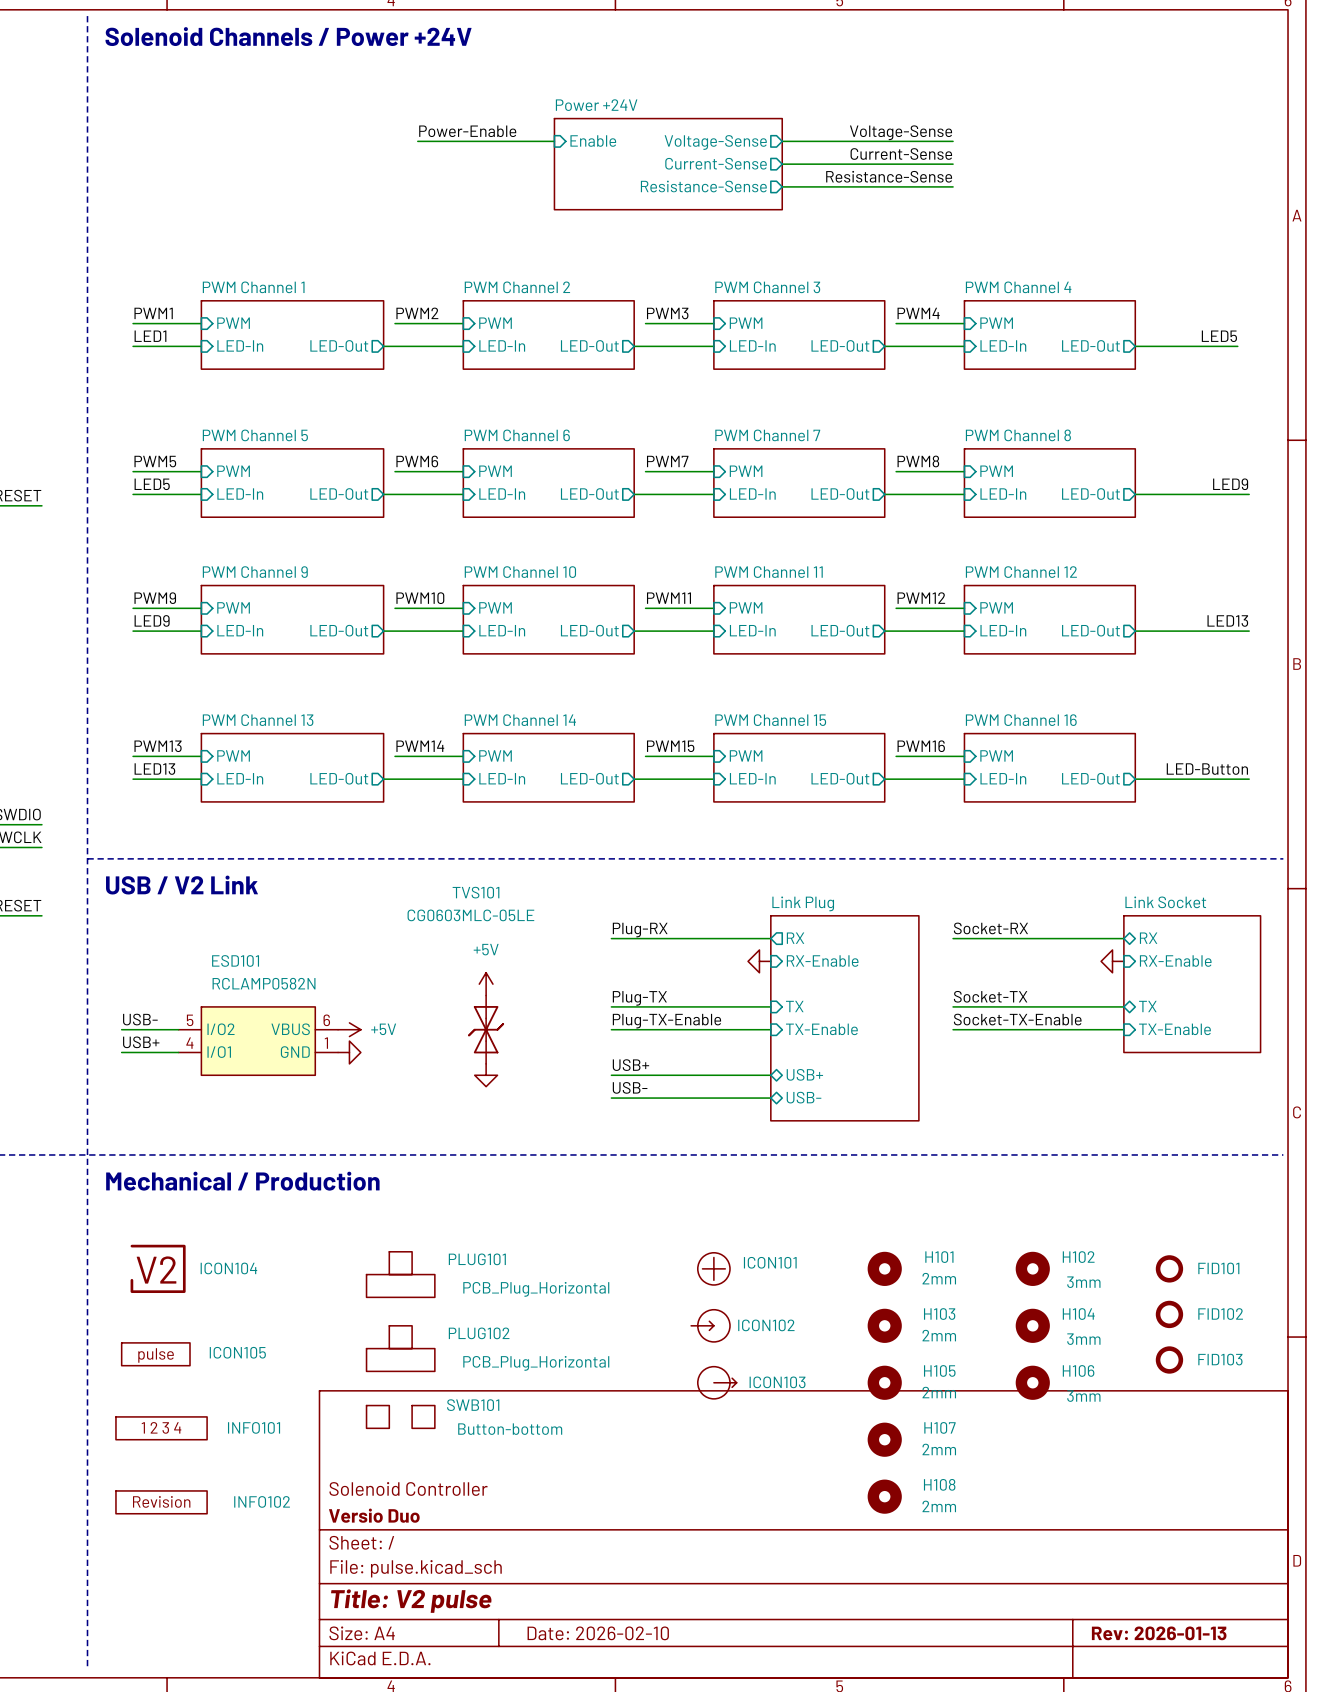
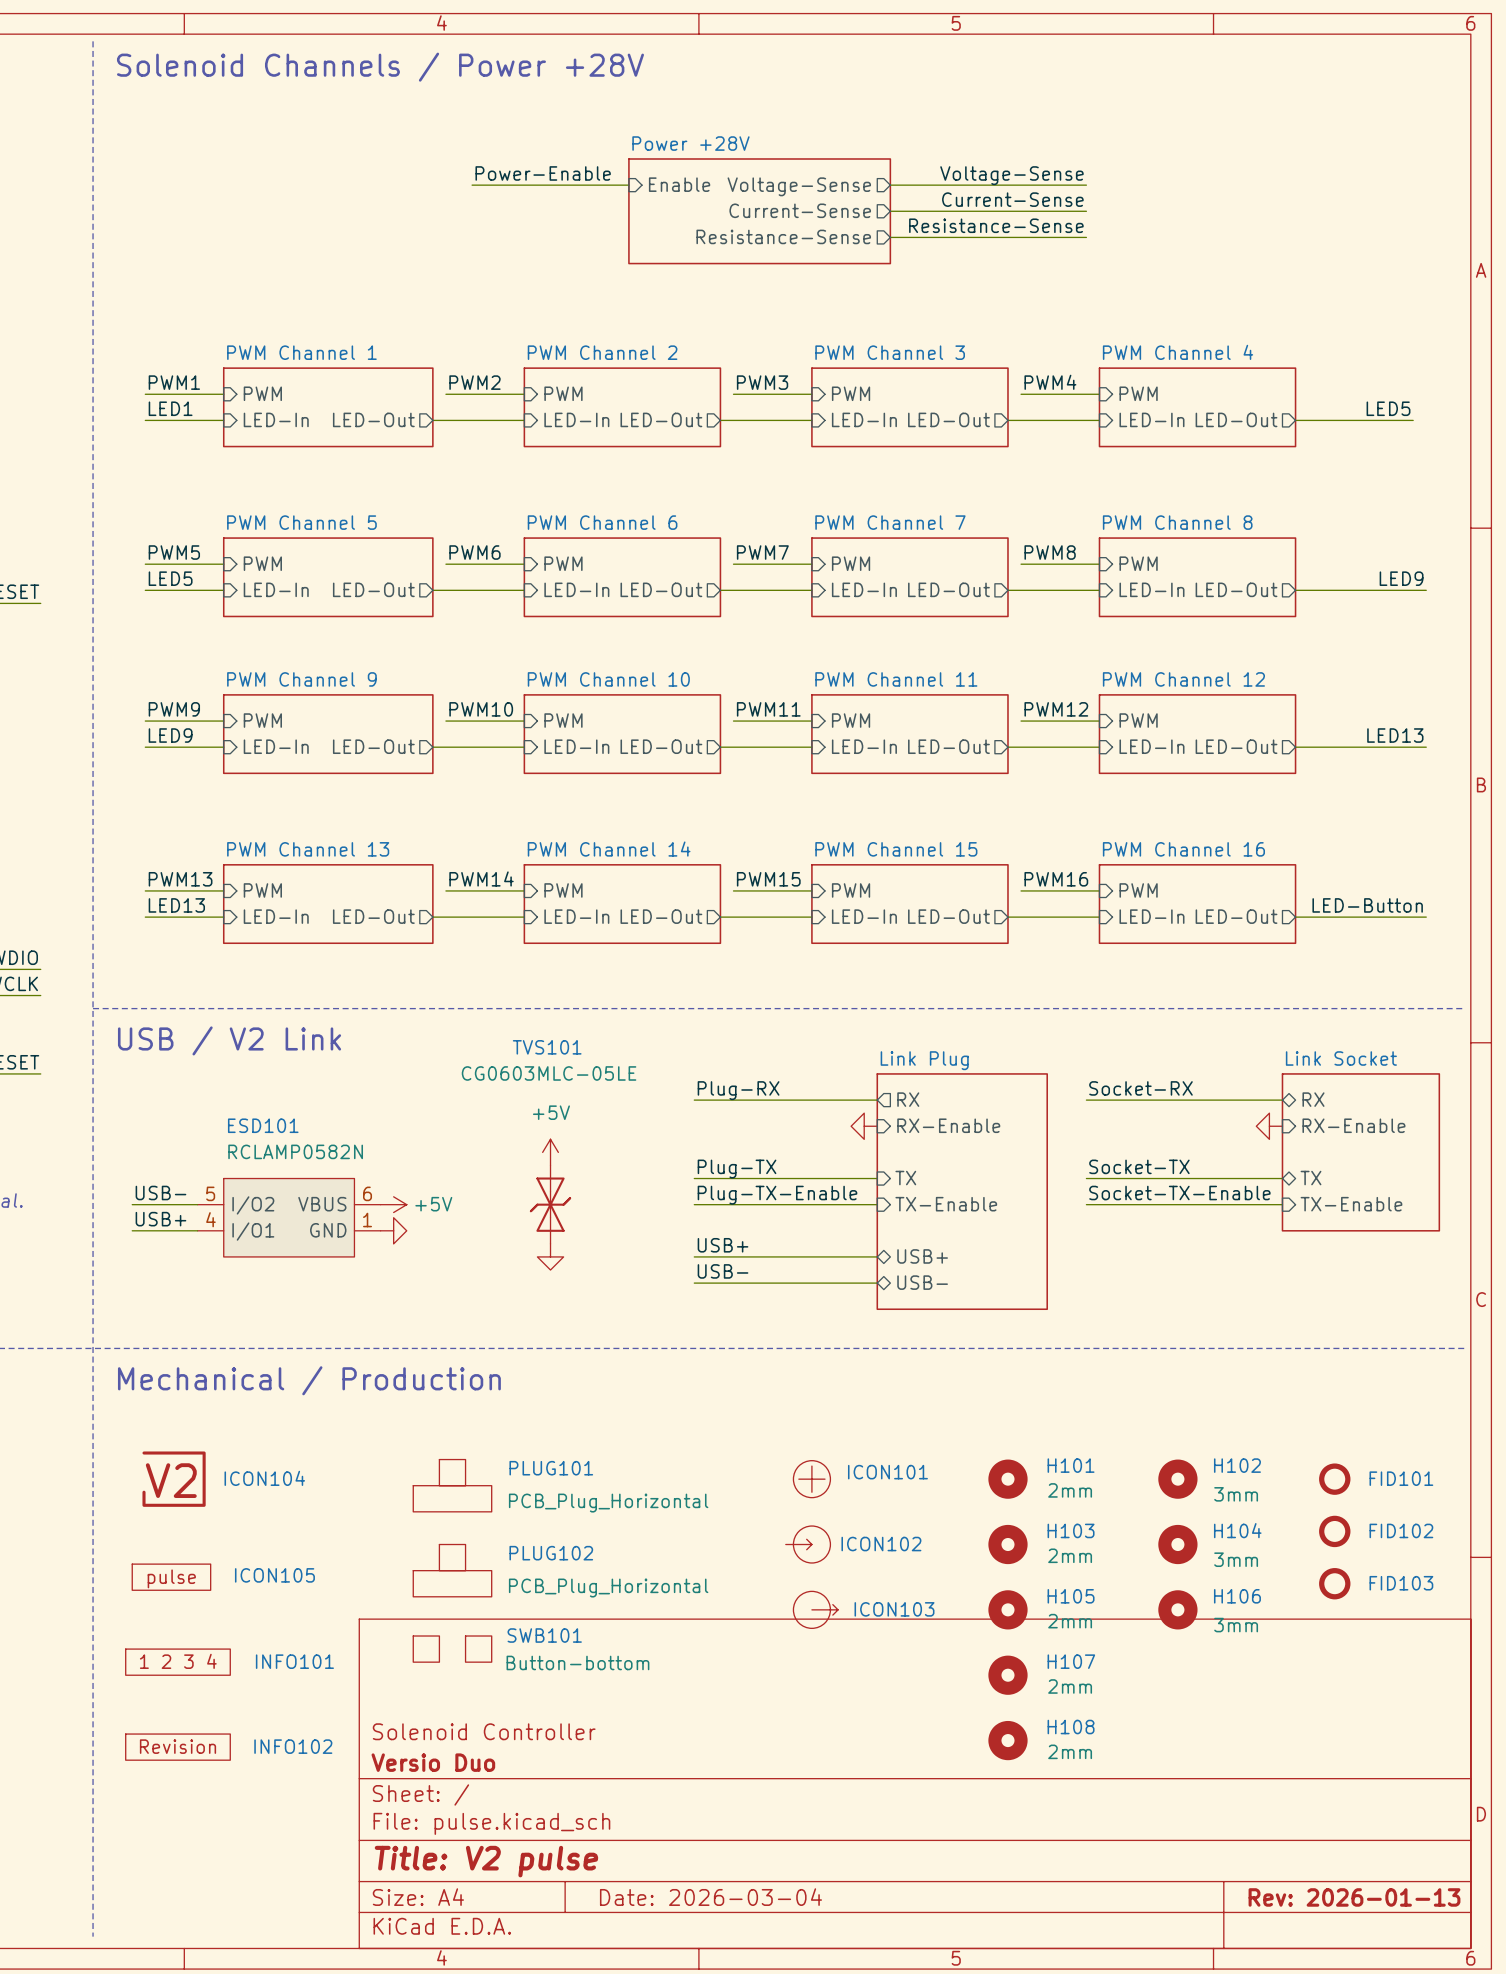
text: Solenoid Channels / Power +24V (288, 36) -> Solenoid Channels / Power +28V (380, 67)
sheet Power +24V name: Power +24V (596, 105) -> Power +28V (690, 143)
title block: Date: 2026-02-10 (598, 1633) -> Date: 2026-03-04 (710, 1897)

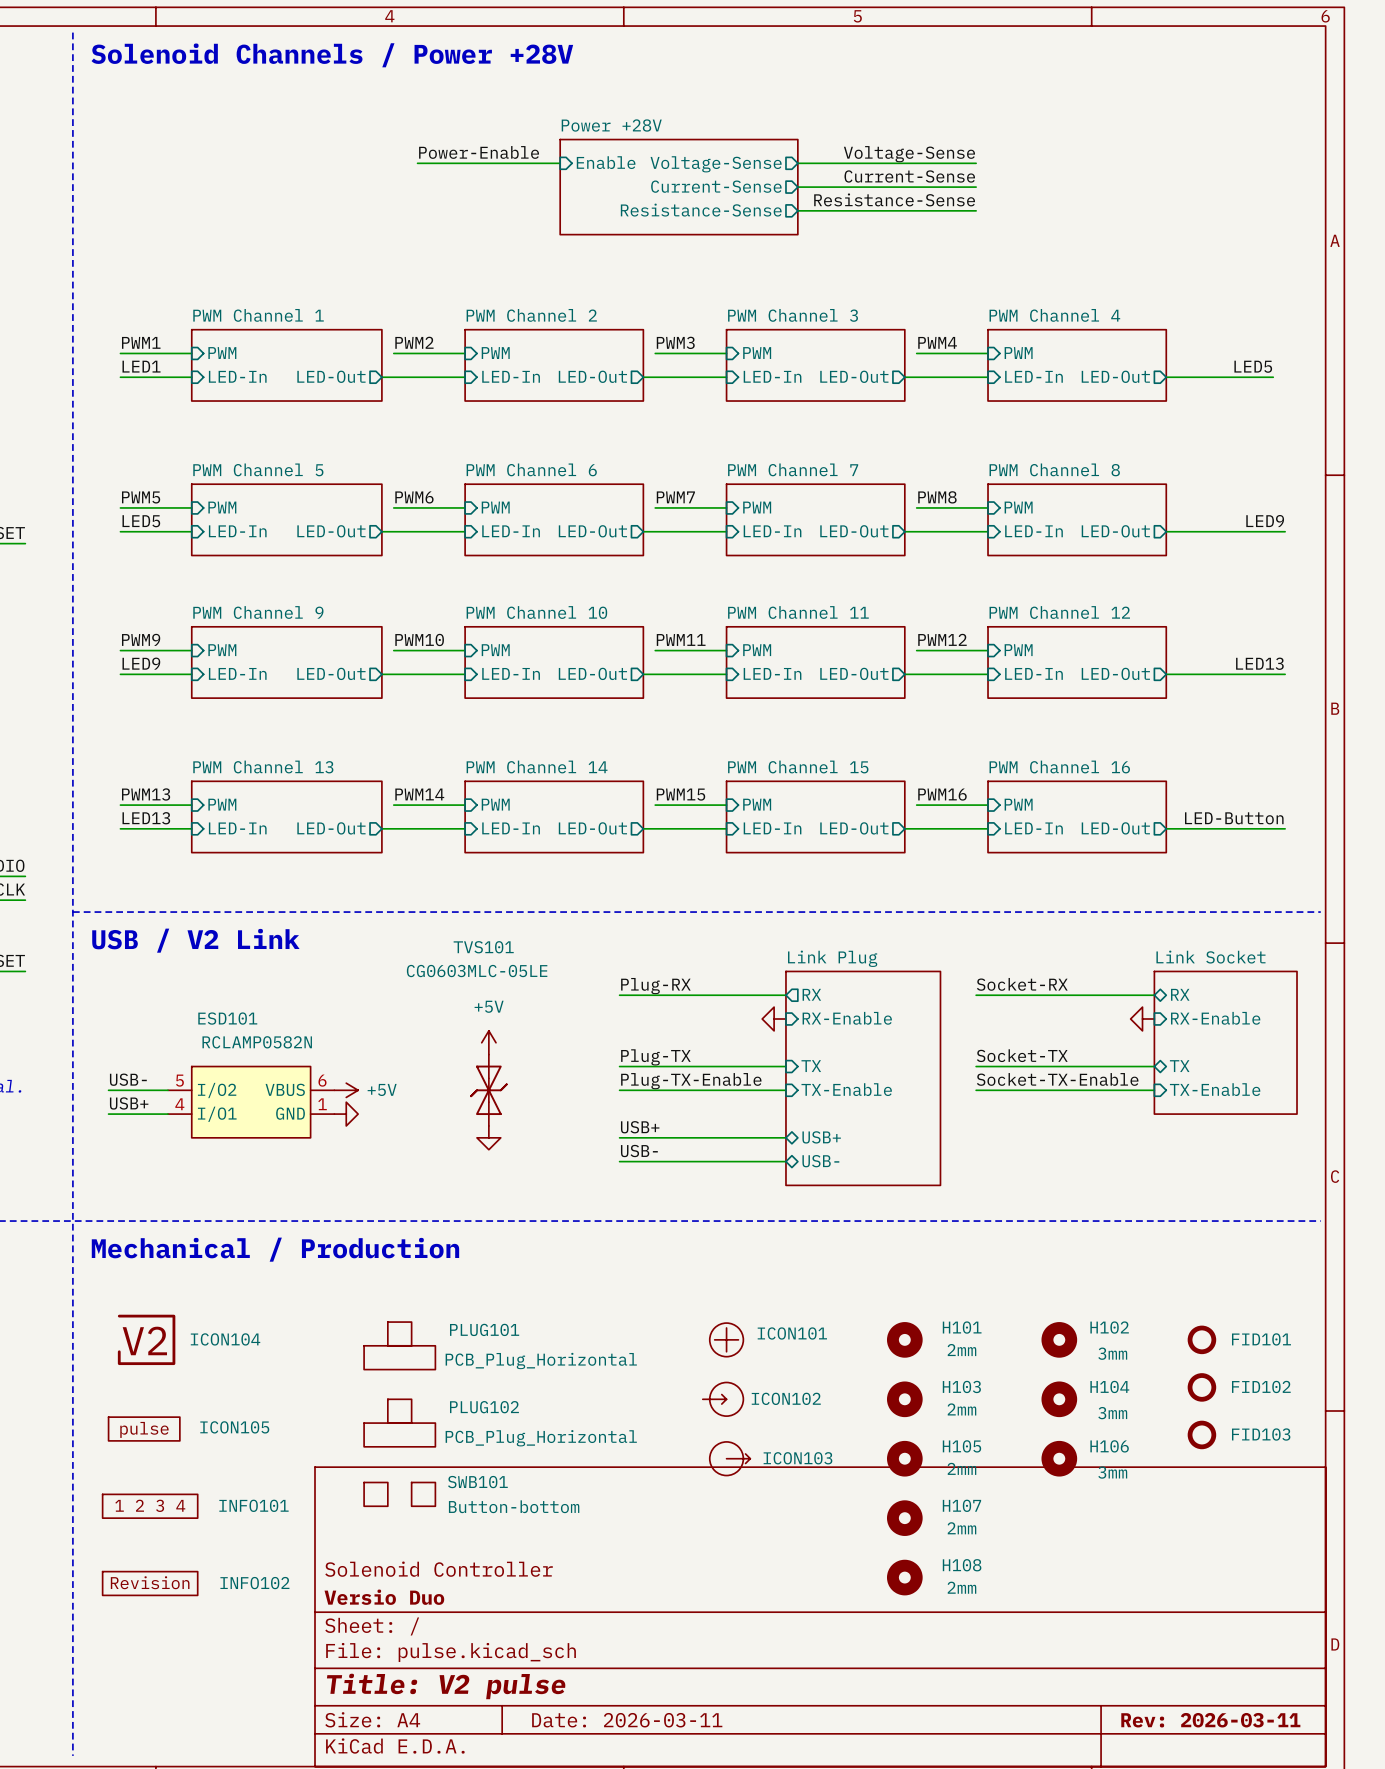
title block: Date: 2026-03-04 (710, 1897) -> Date: 2026-03-11 (627, 1720)
title block: Rev: 2026-01-13 (1354, 1897) -> Rev: 2026-03-11 (1210, 1720)

